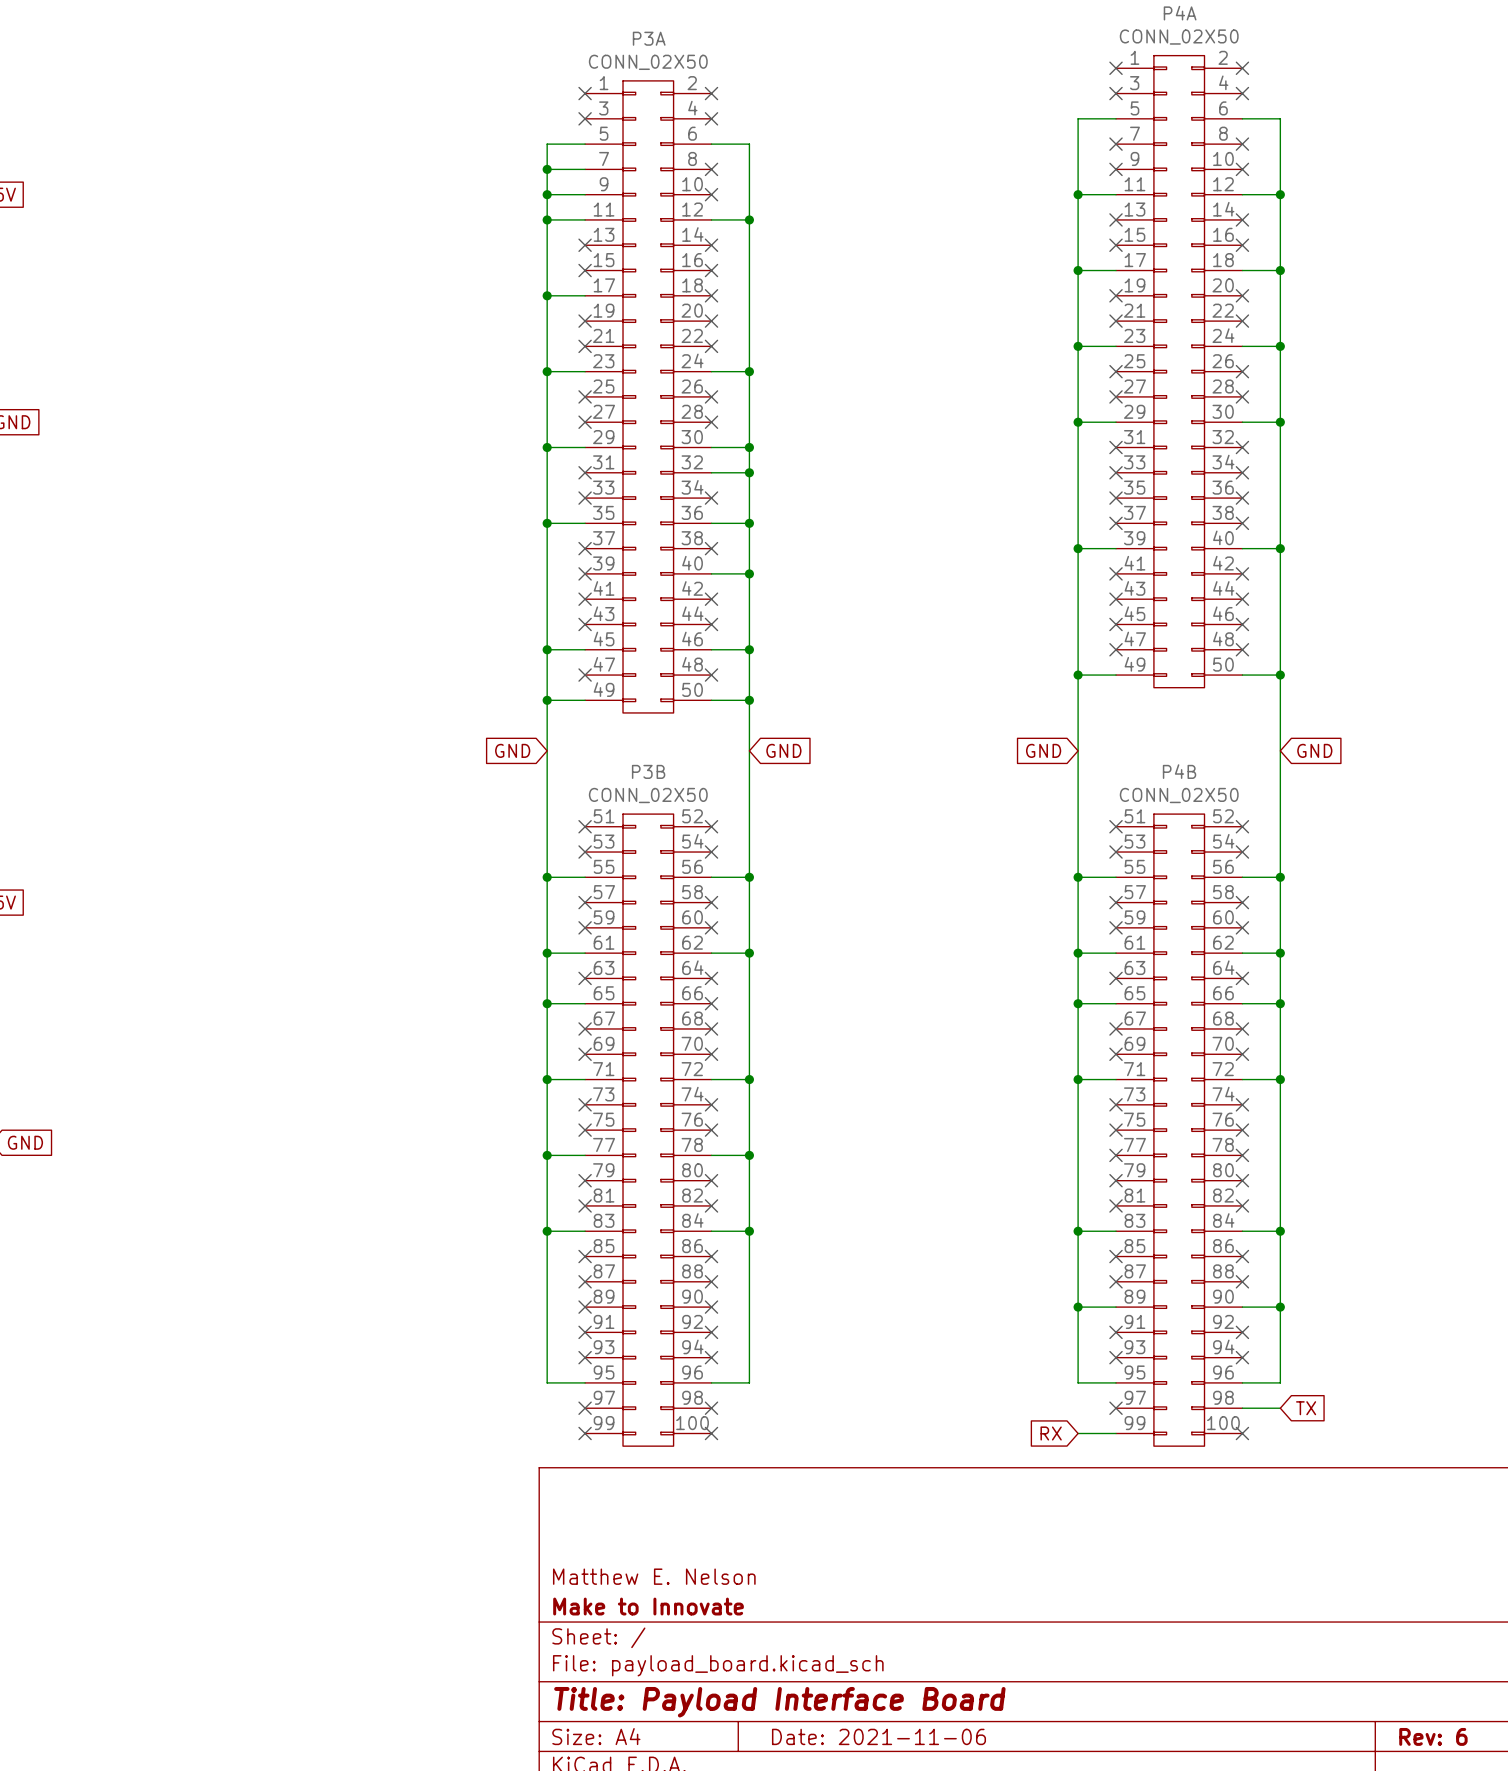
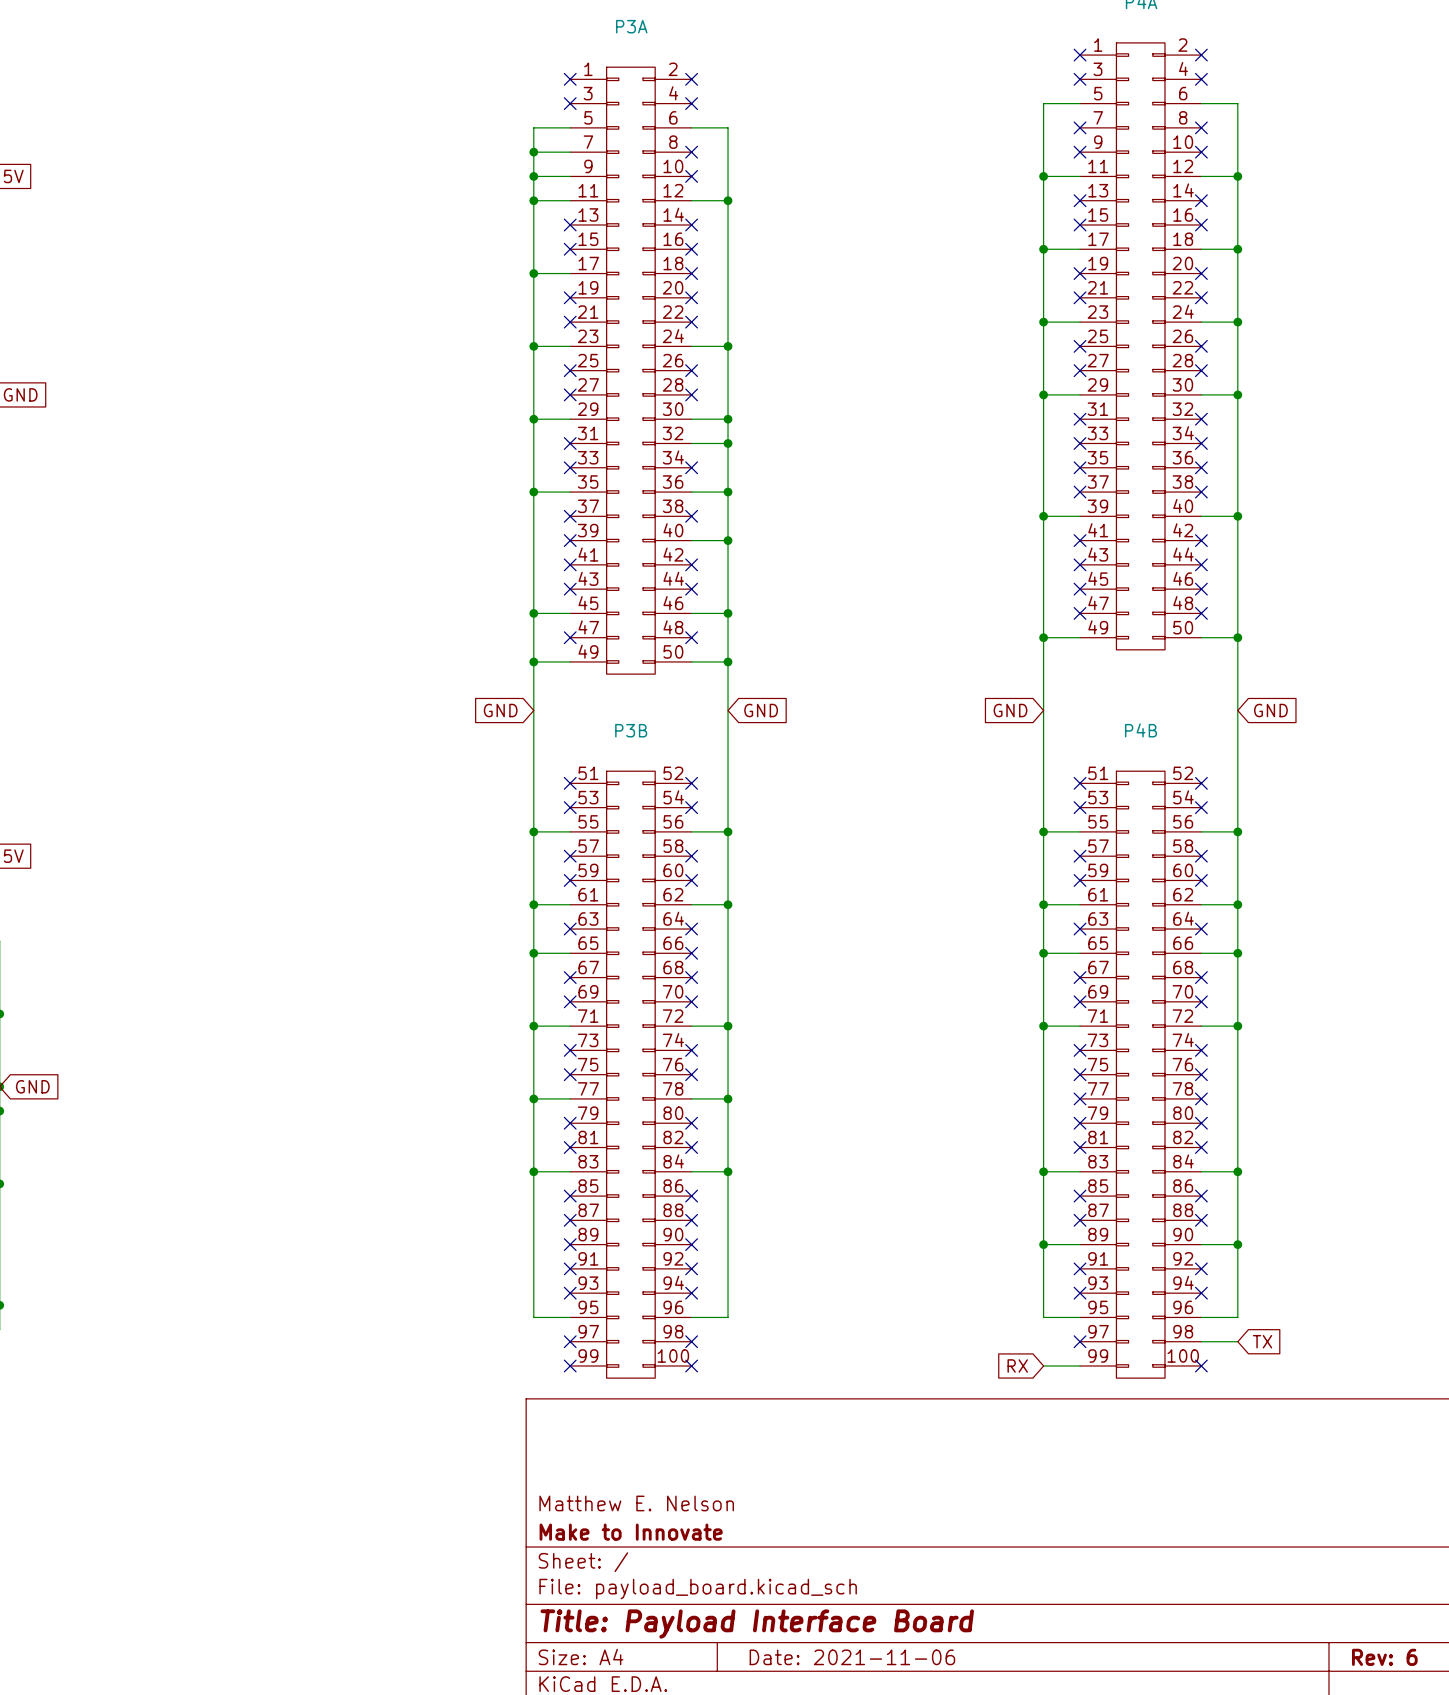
P4A value: CONN_02X50 (1179, 37) -> none
P3A value: CONN_02X50 (648, 62) -> none
P3B value: CONN_02X50 (648, 795) -> none
P4B value: CONN_02X50 (1179, 795) -> none

